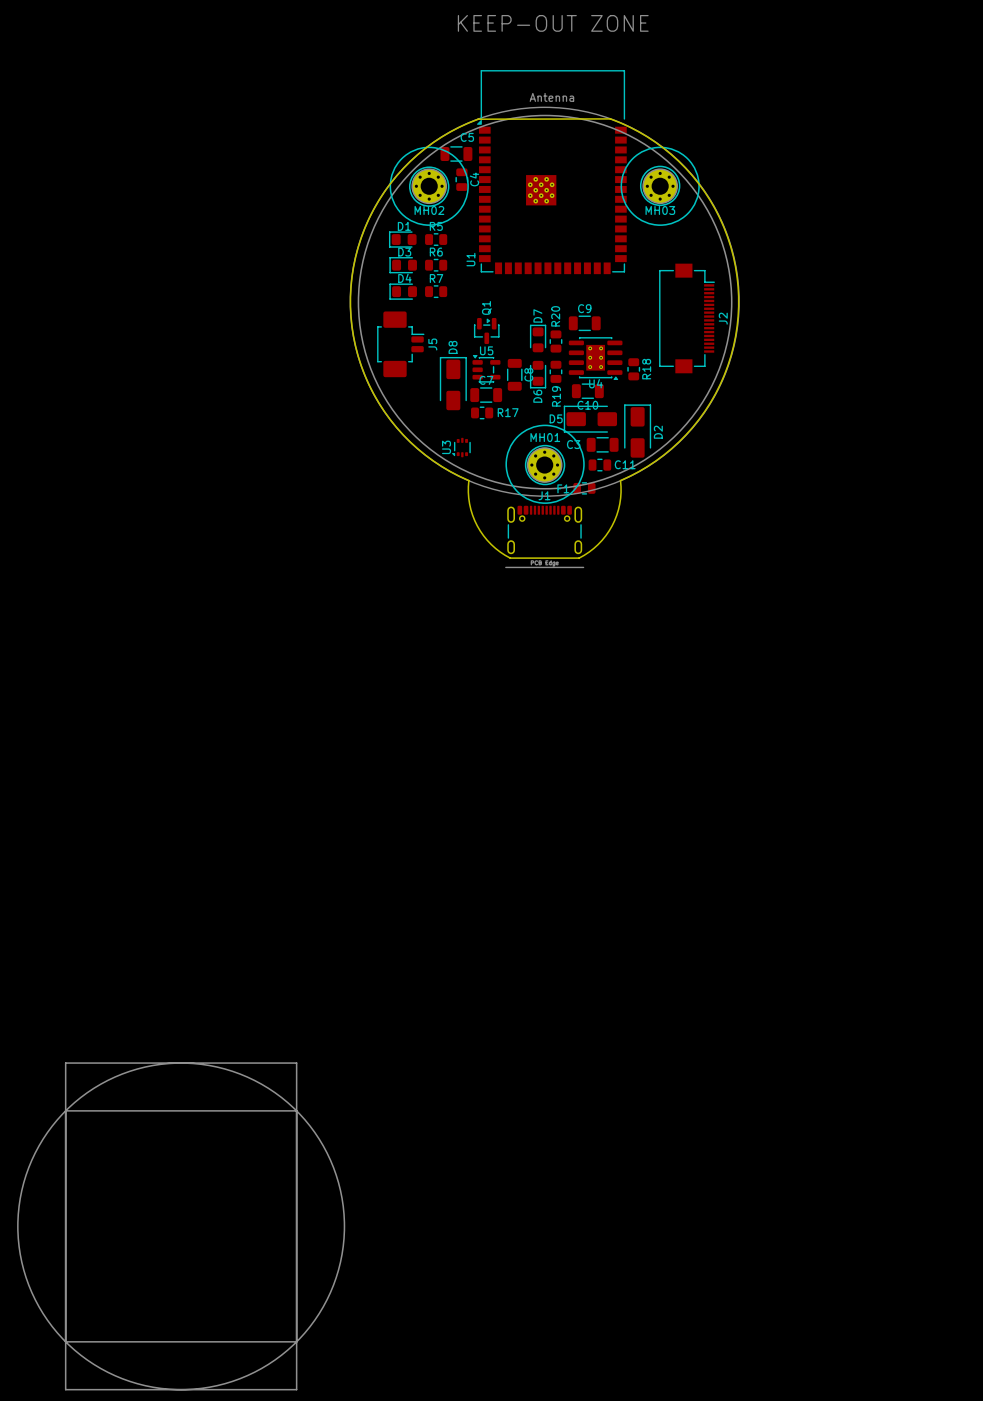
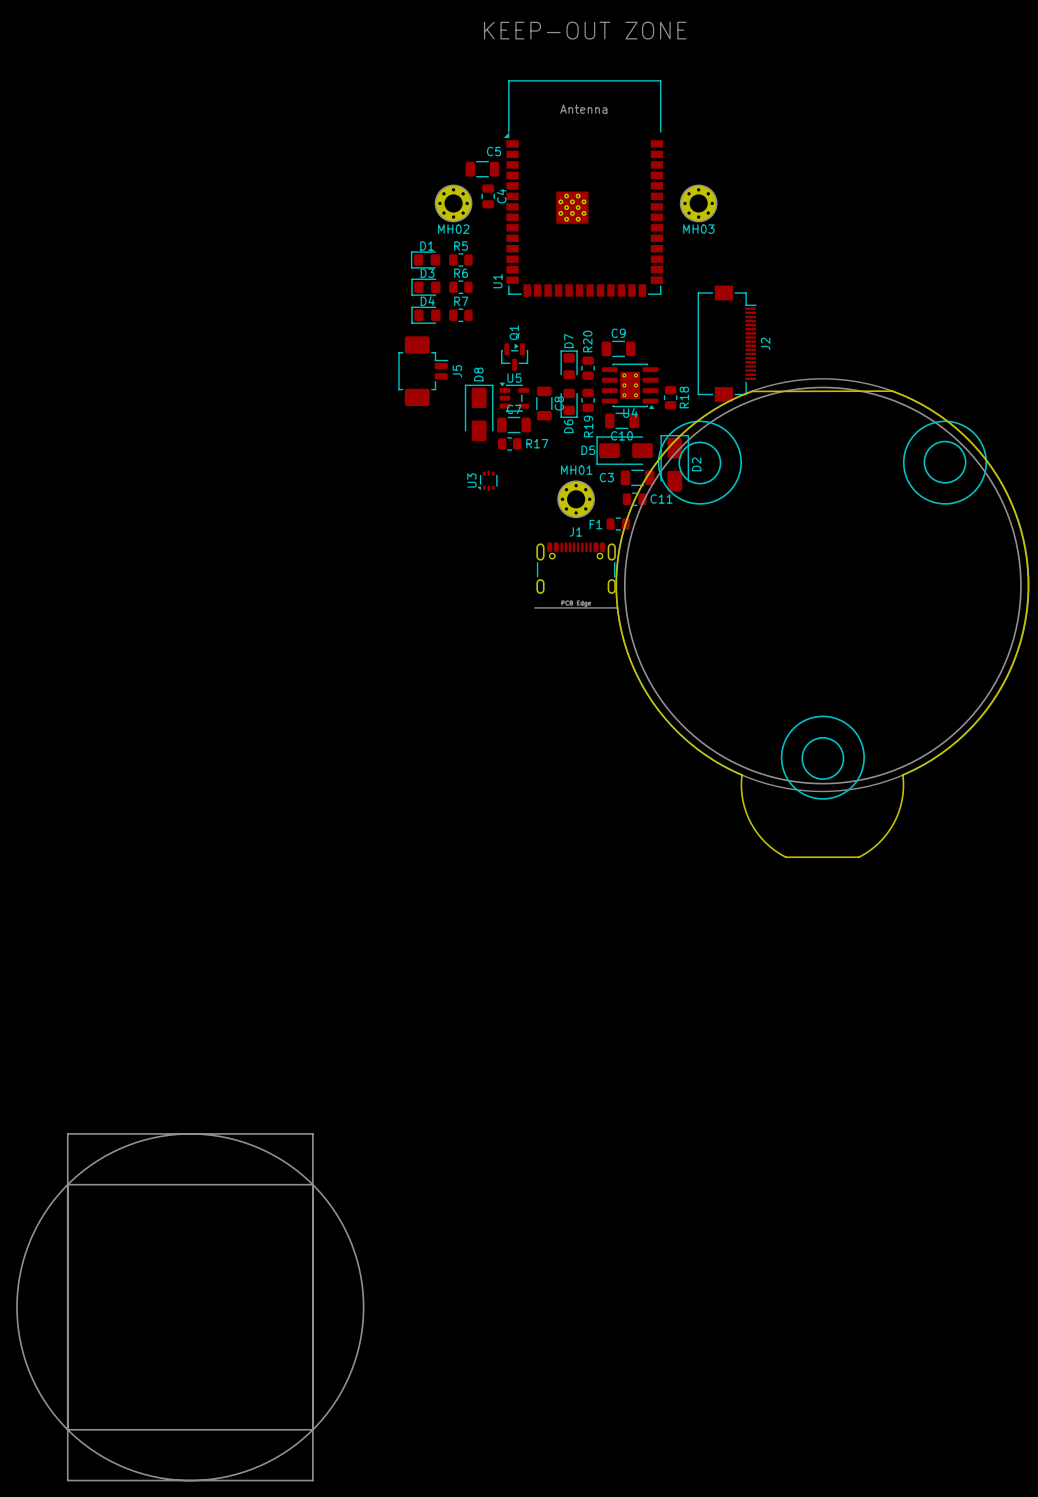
drawing: [350, 107, 740, 497] -> none
board edge: (610, 118) (478, 119) (450, 131) (417, 154) (390, 184) (369, 218) (355, 256) (351, 286) (352, 326) (361, 366) (373, 393) (390, 419) (417, 448) (442, 466) (468, 480) (469, 503) (477, 525) (491, 544) (510, 558) (579, 558) (598, 544) (609, 530) (616, 515) (620, 498) (620, 480) (647, 466) (663, 455) (693, 427) (705, 410) (720, 384) (733, 346) (738, 306) (737, 276) (727, 236) (715, 209) (698, 183) (671, 154) (638, 131) (610, 118) -> none
drawing: none -> [615, 378, 1029, 800]
board edge: none -> (892, 391) (751, 391) (722, 404) (687, 429) (658, 460) (636, 496) (621, 537) (616, 569) (618, 611) (627, 653) (640, 682) (658, 709) (687, 741) (713, 760) (741, 774) (742, 799) (750, 823) (765, 842) (785, 857) (859, 857) (879, 842) (890, 828) (898, 811) (903, 793) (902, 774) (940, 754) (957, 740) (979, 718) (1003, 682) (1016, 653) (1022, 632) (1028, 590) (1026, 558) (1016, 516) (1003, 487) (979, 451) (956, 428) (930, 409) (892, 391)
drawing position: (545, 464) -> (699, 462)
drawing position: (545, 465) -> (699, 463)

